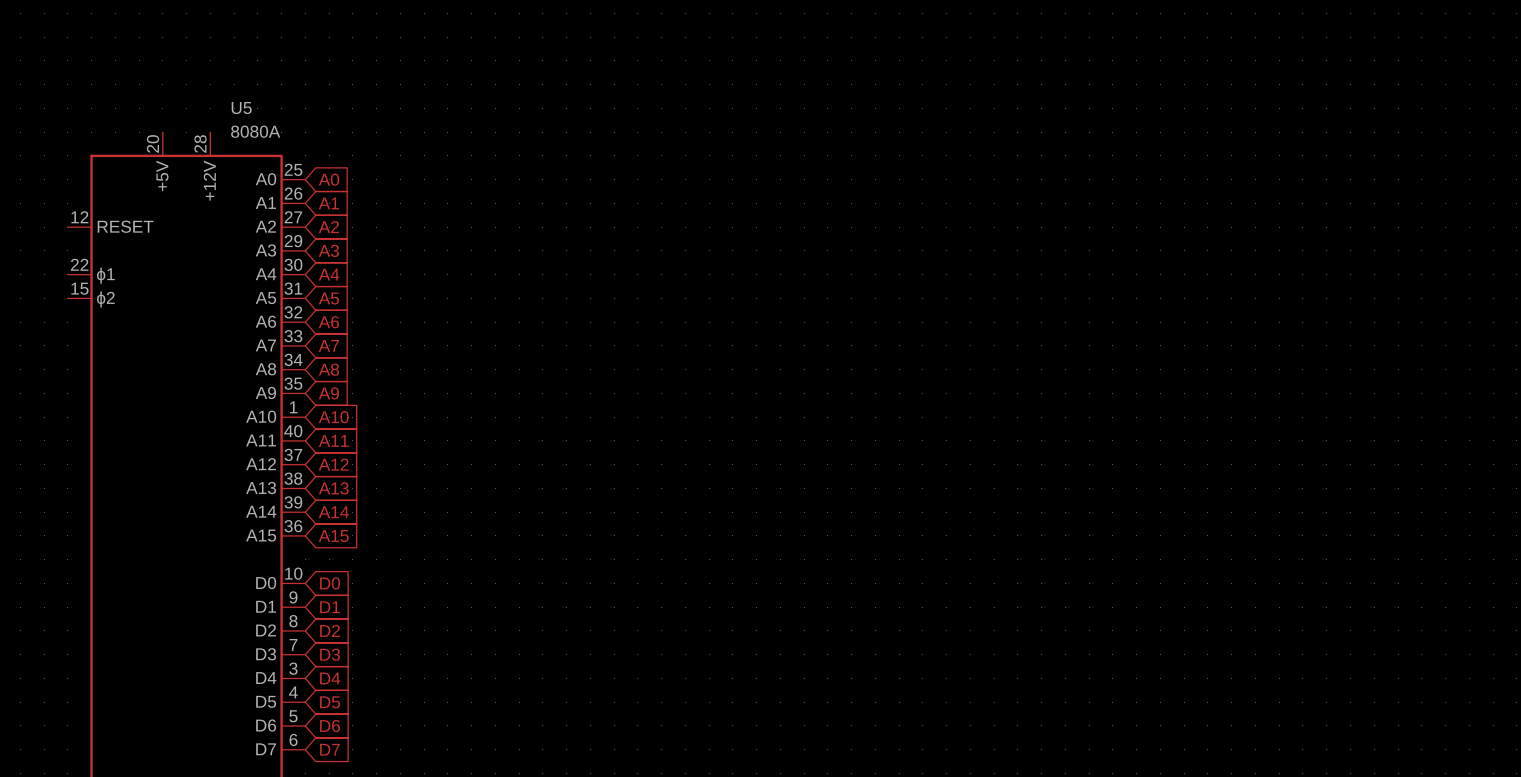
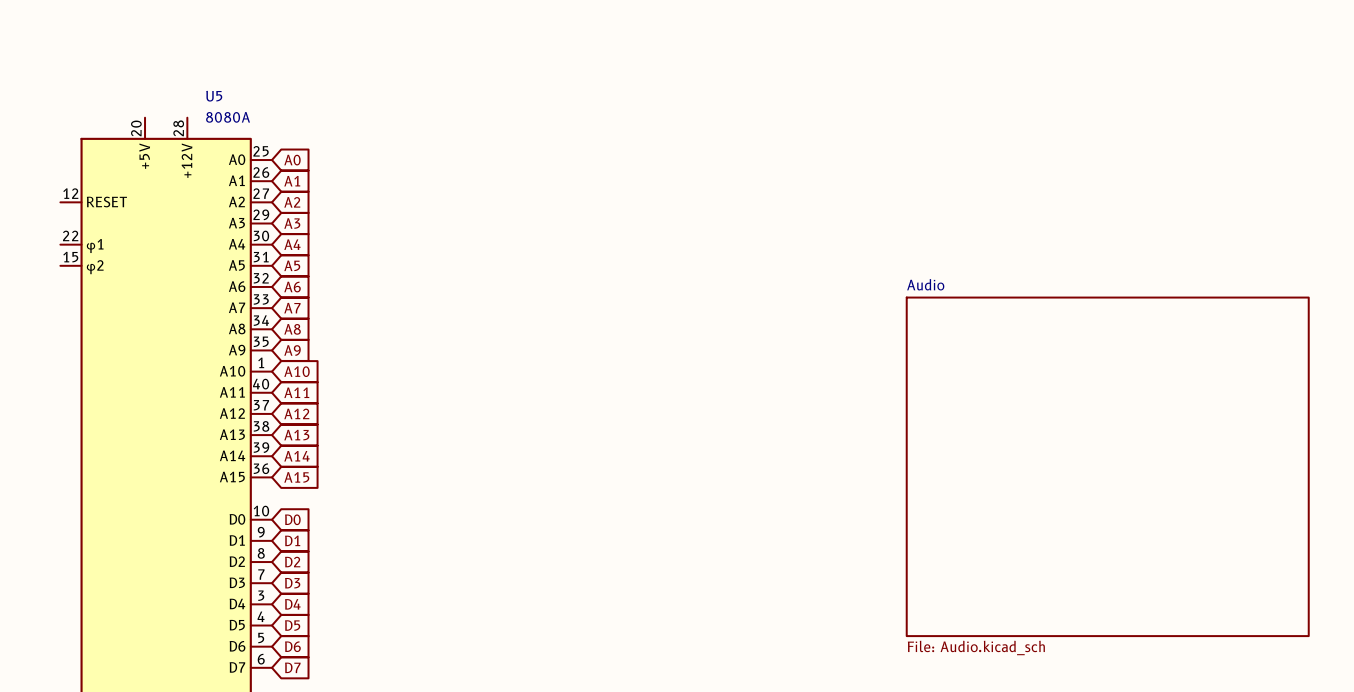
sheet Audio: none -> File: Audio.kicad_sch (1107, 466)

